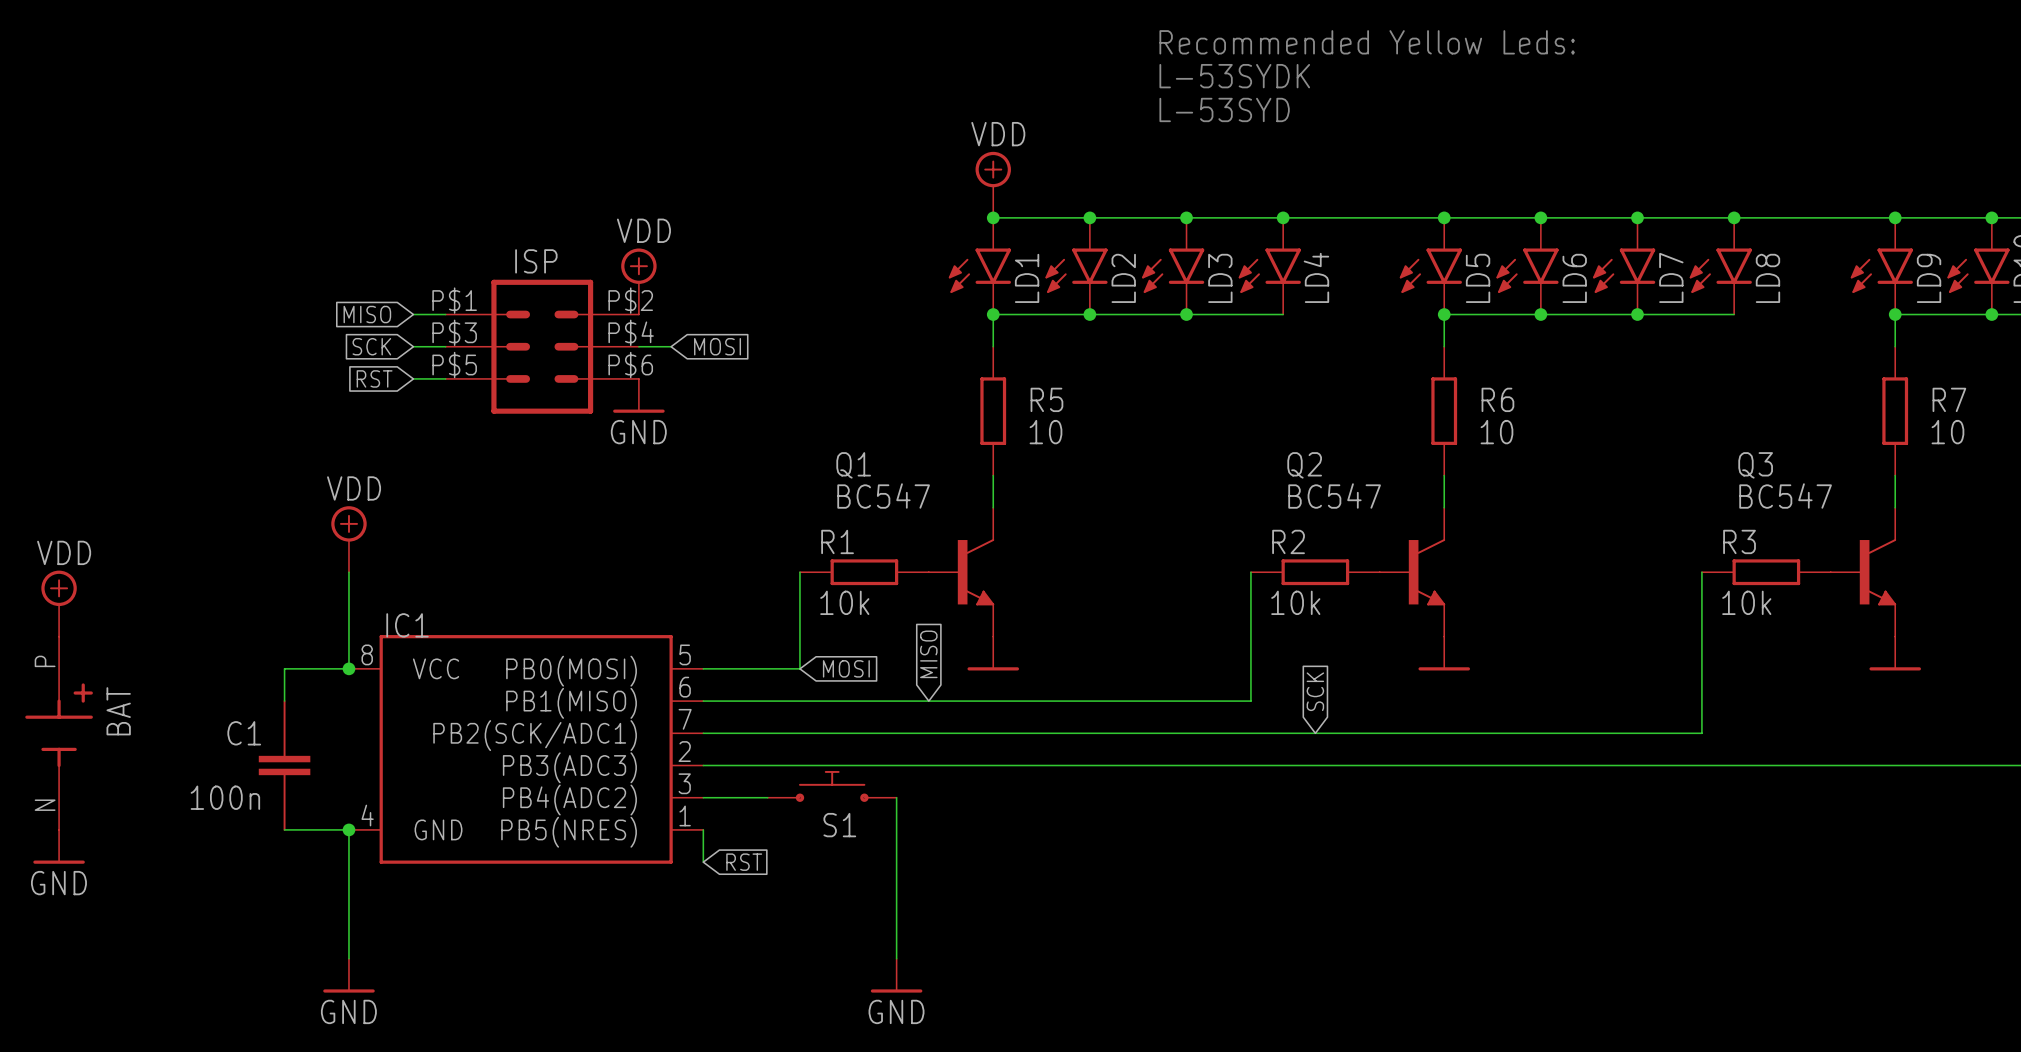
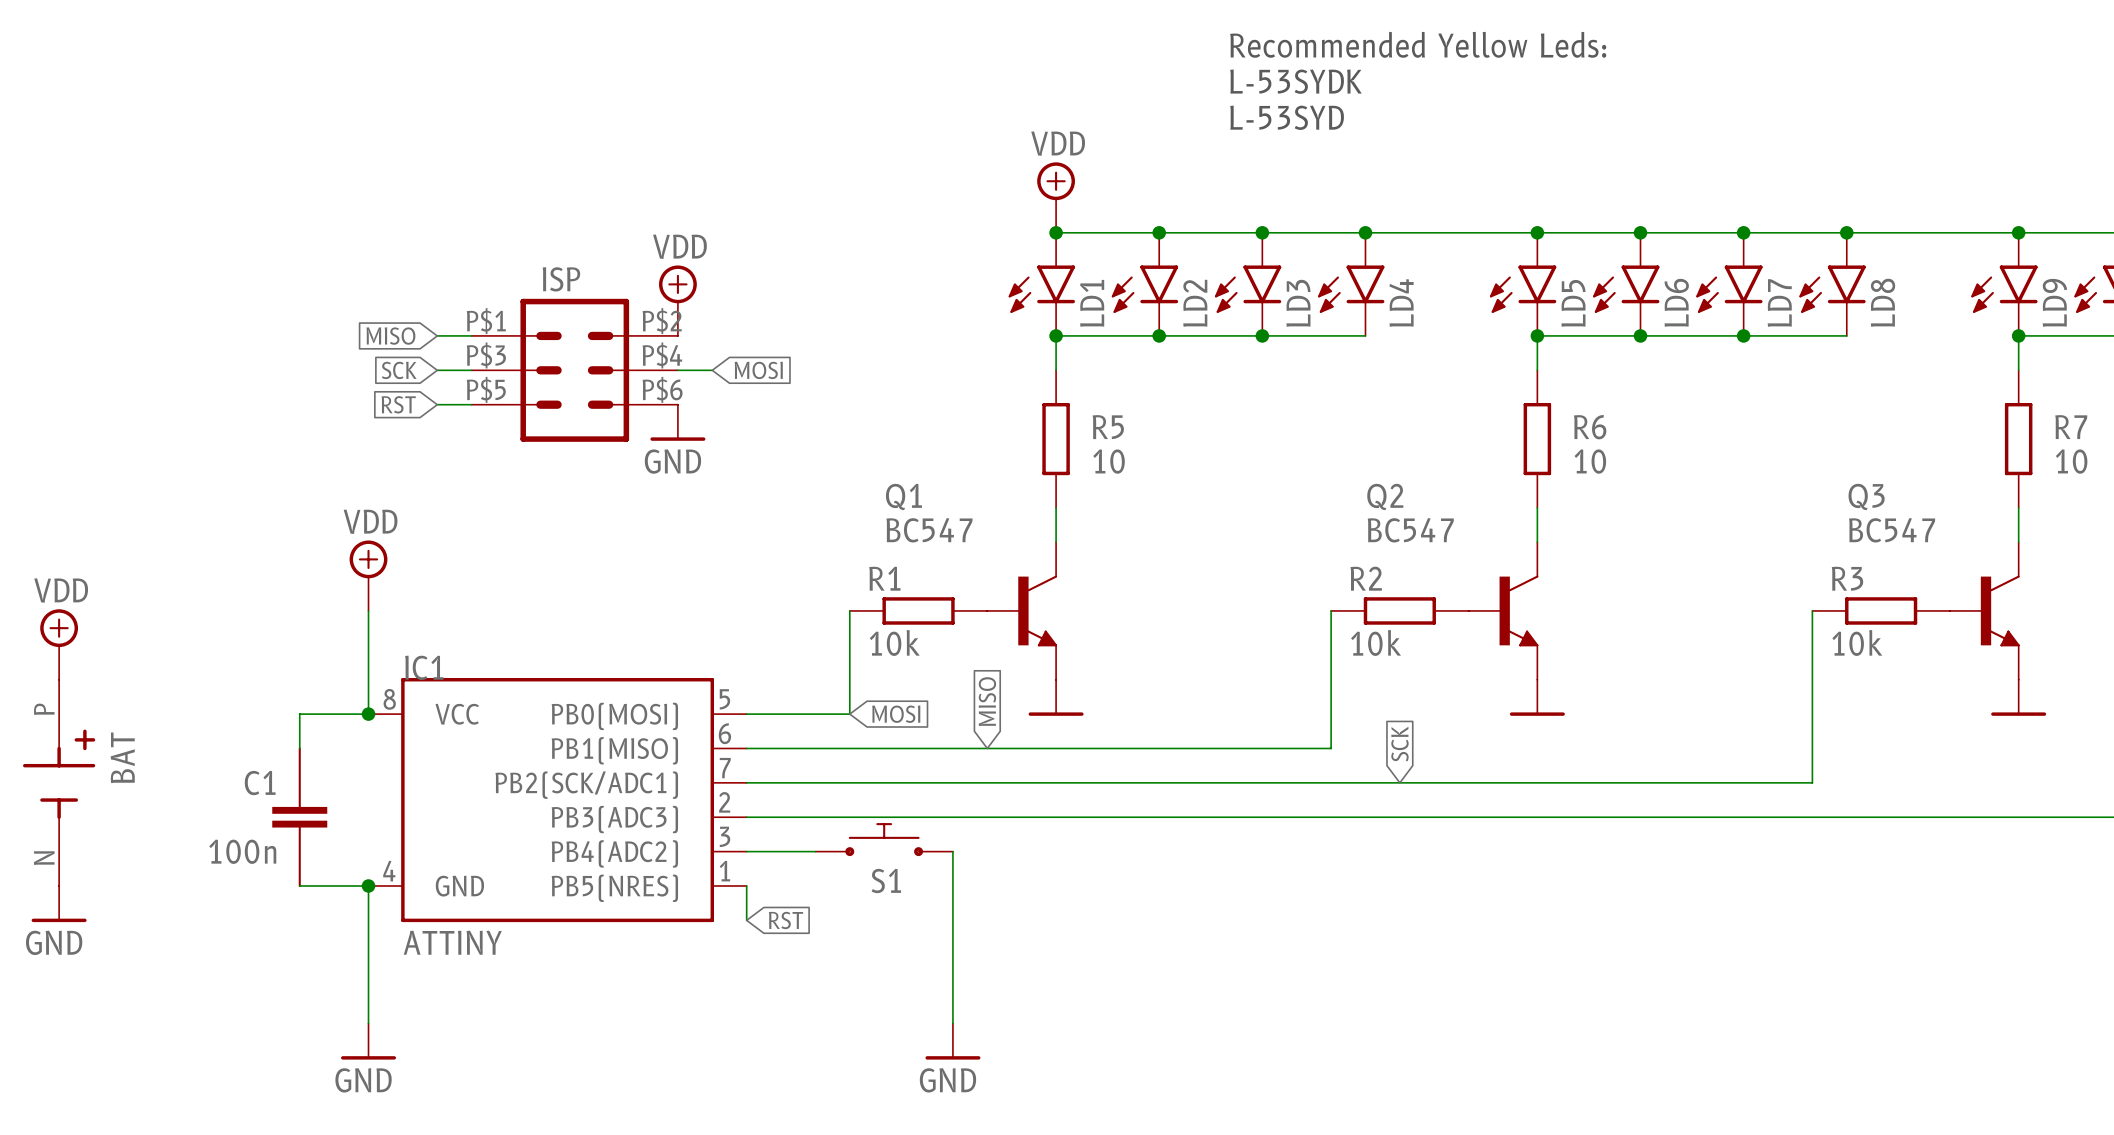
IC1 value: none -> ATTINY (452, 942)

